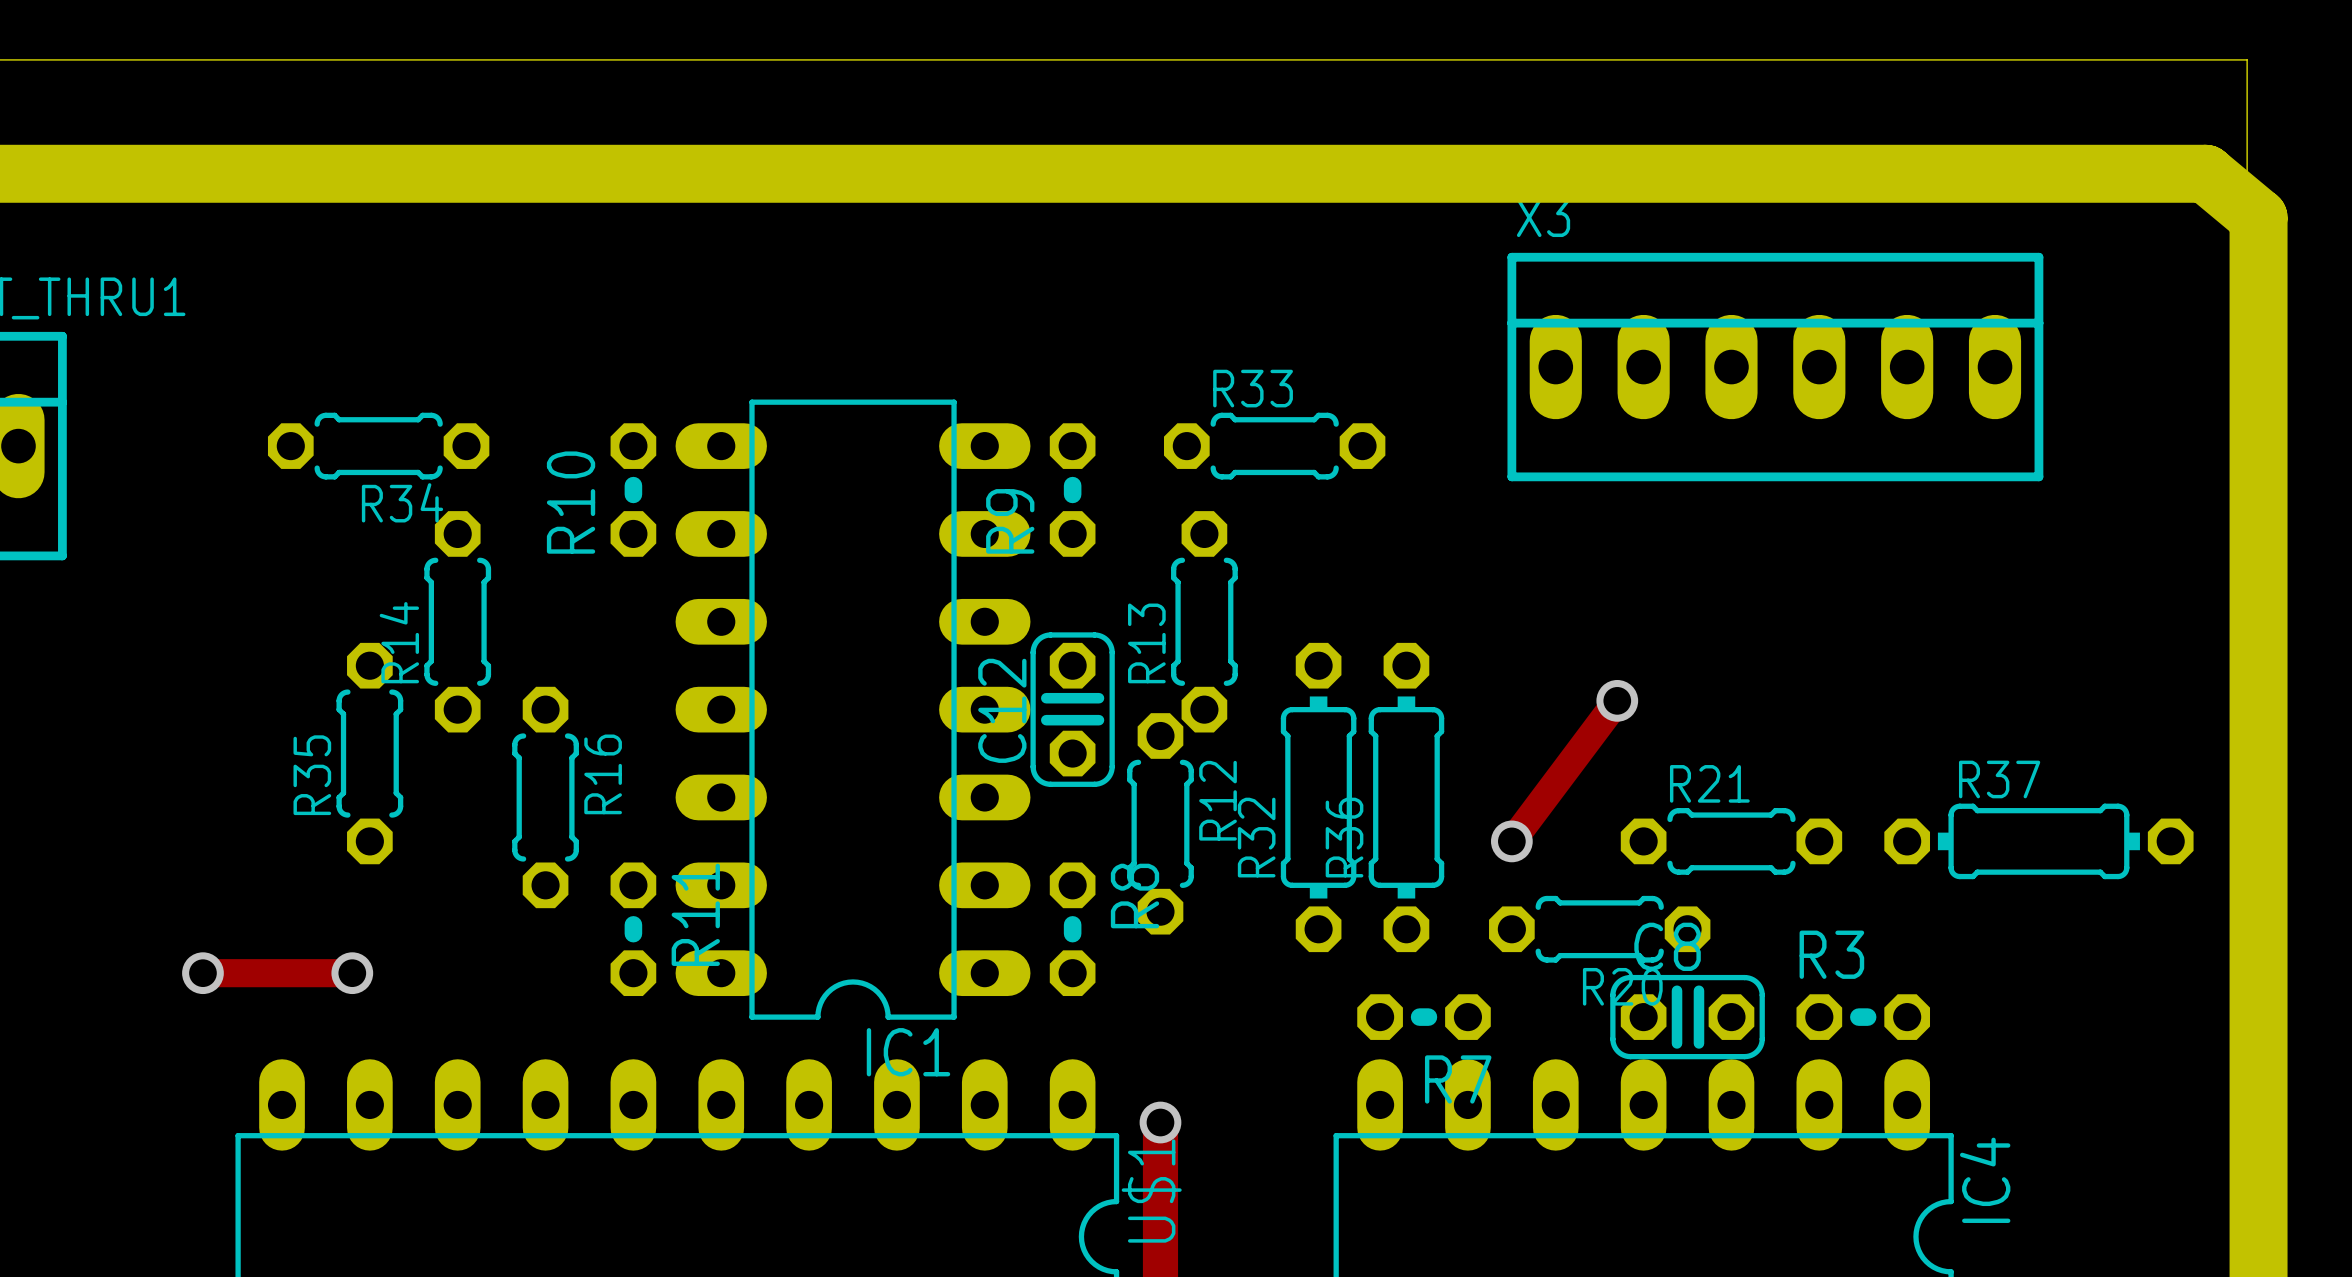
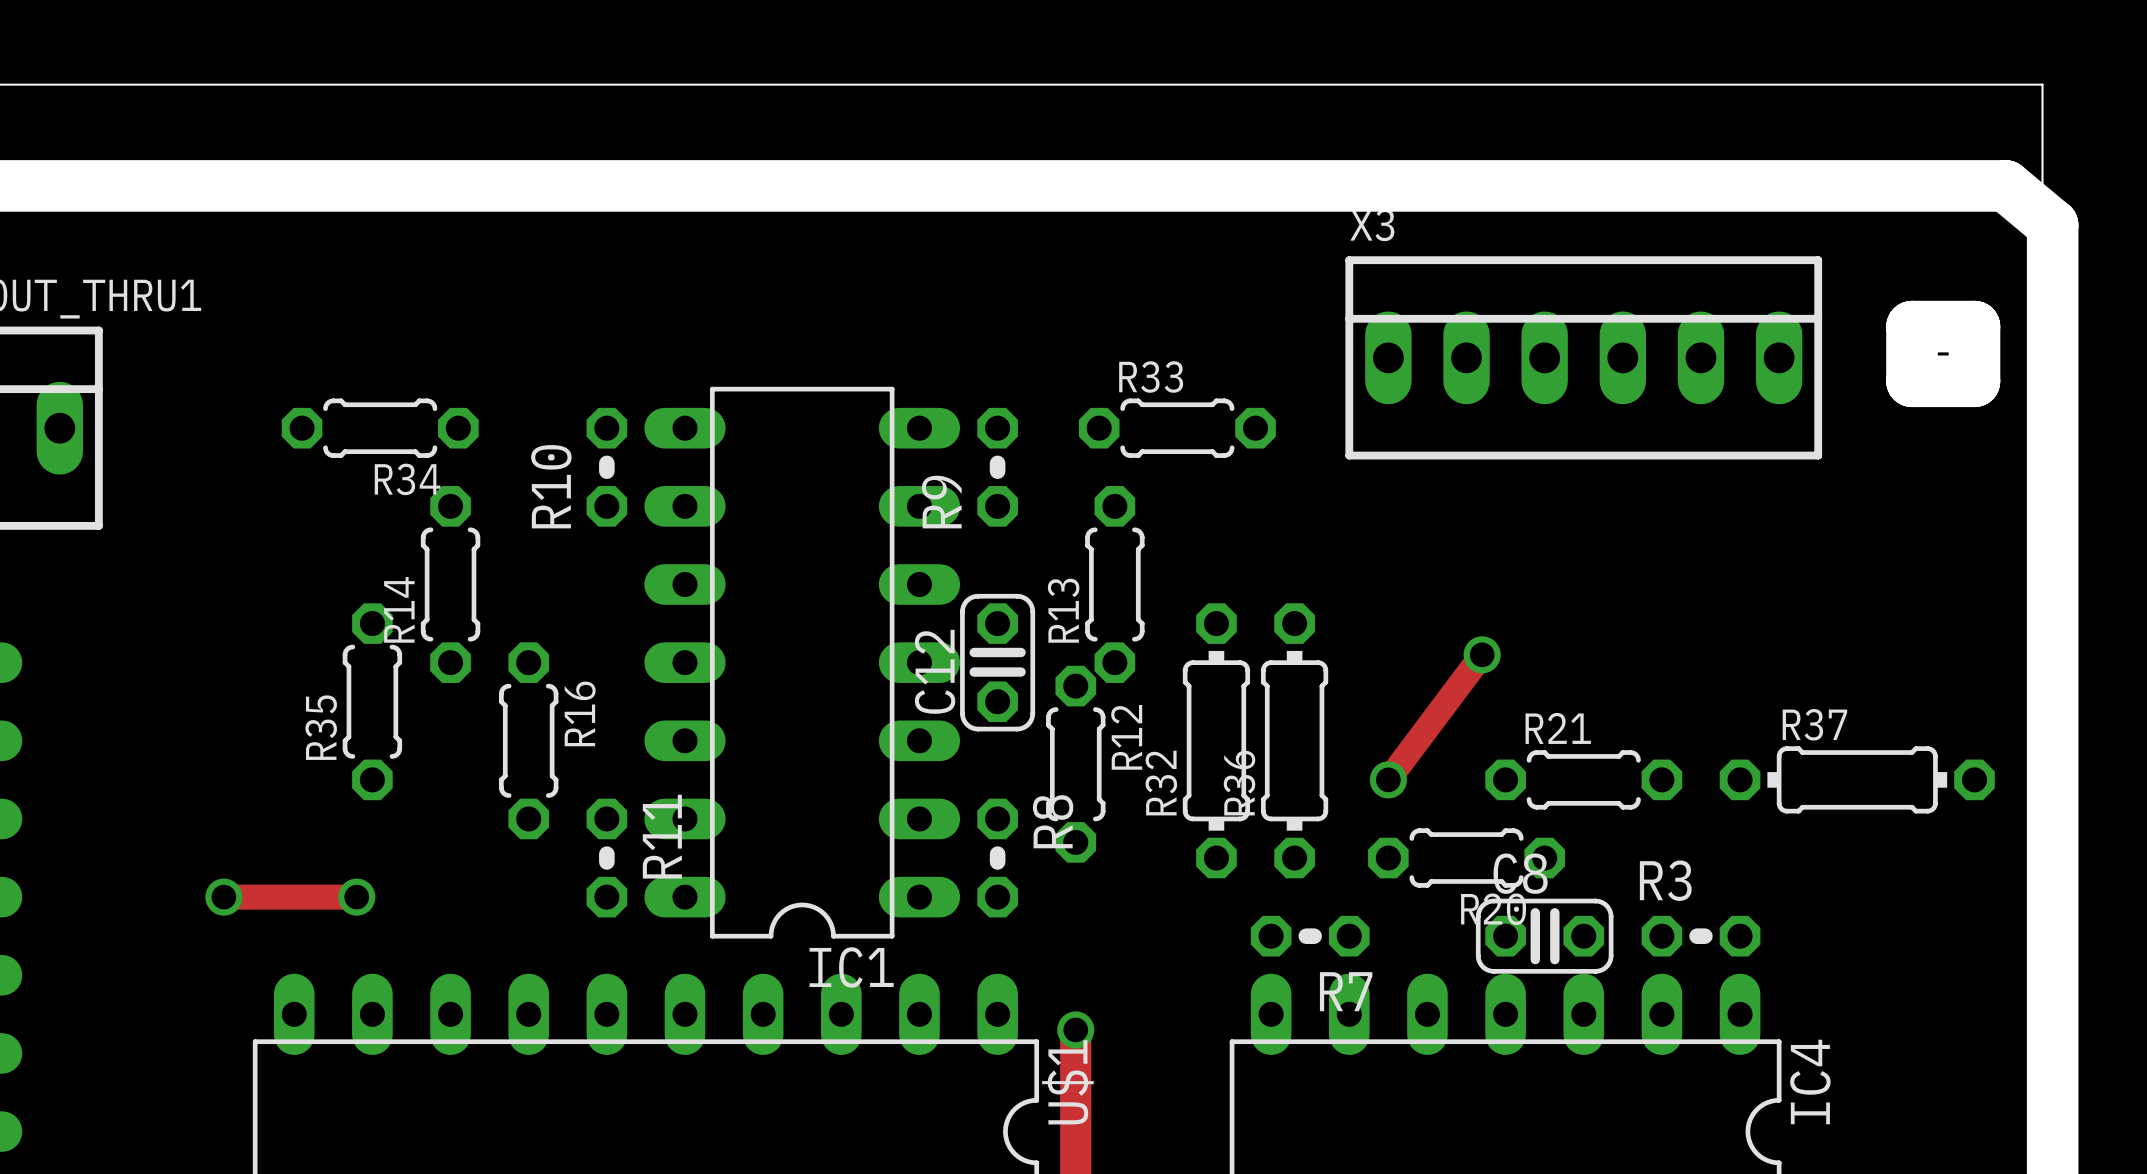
board edge: none -> (1911, 326) (1974, 326) (1974, 381) (1911, 381) (1911, 326)
X3 position: (1775, 367) -> (1583, 357)

